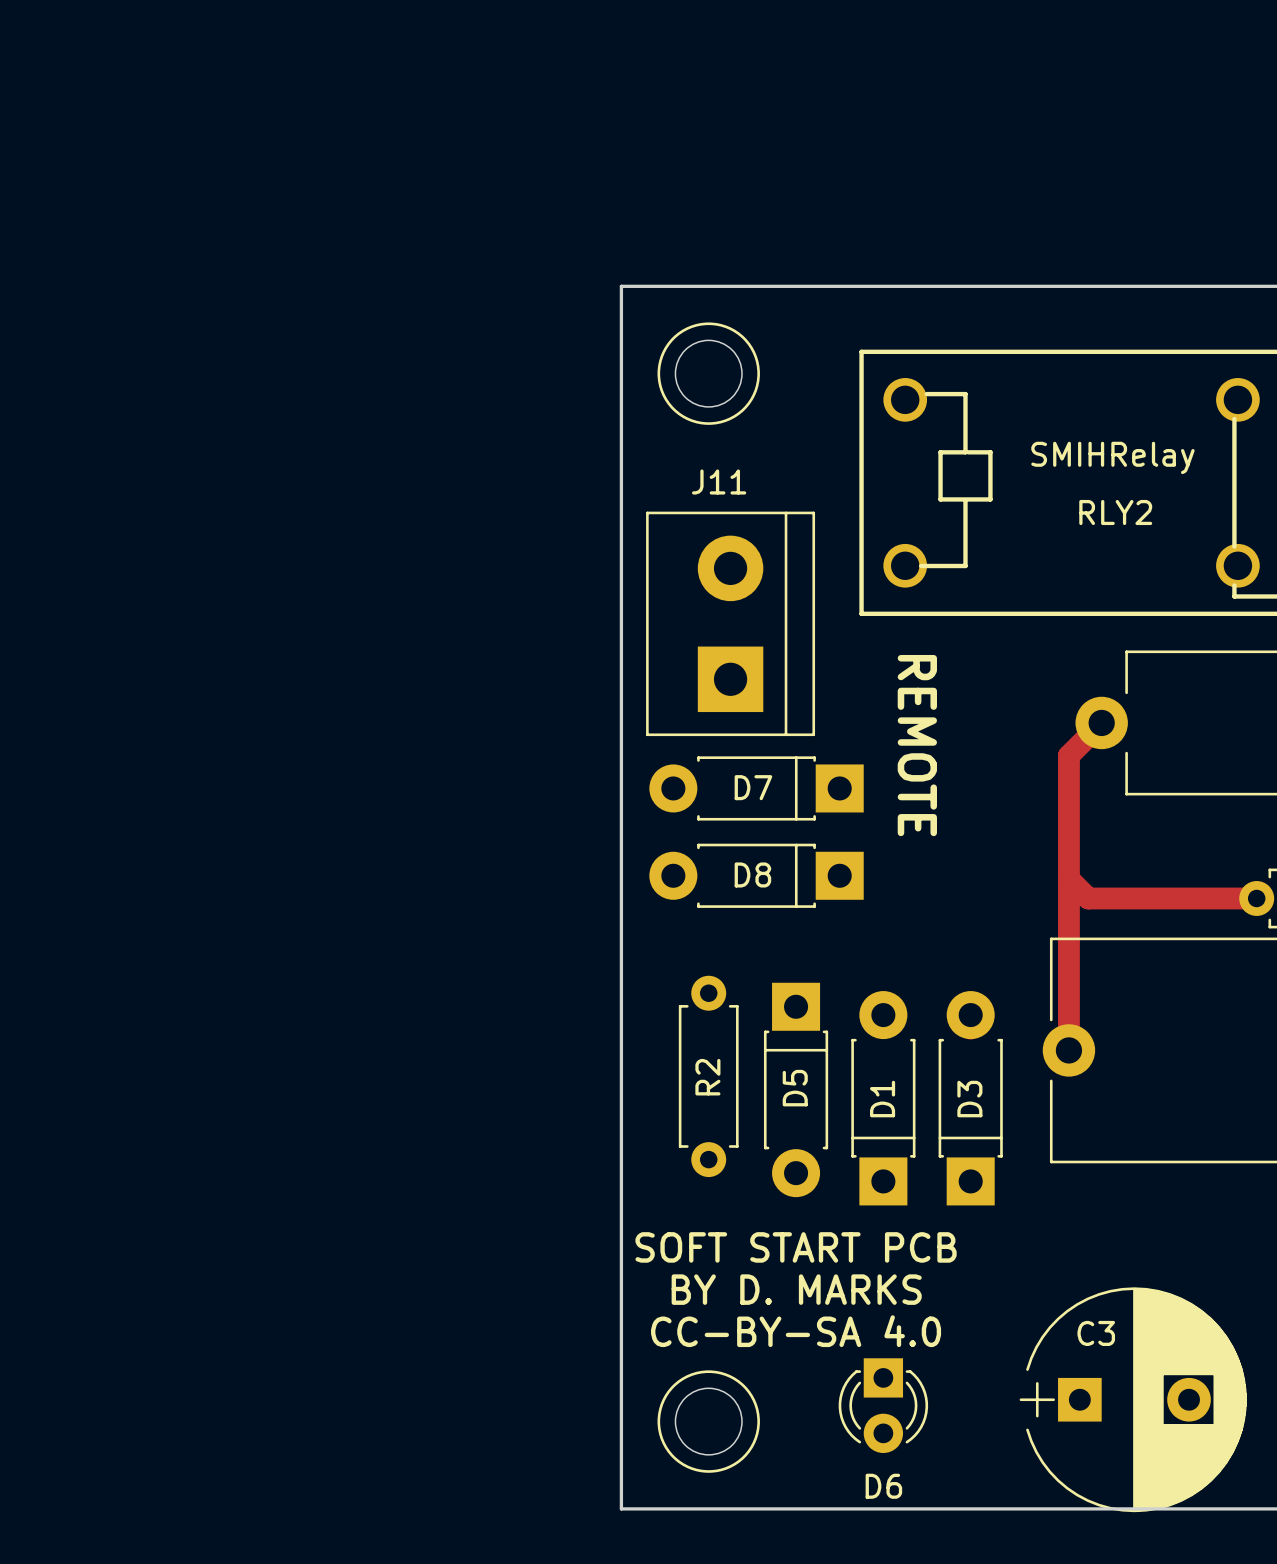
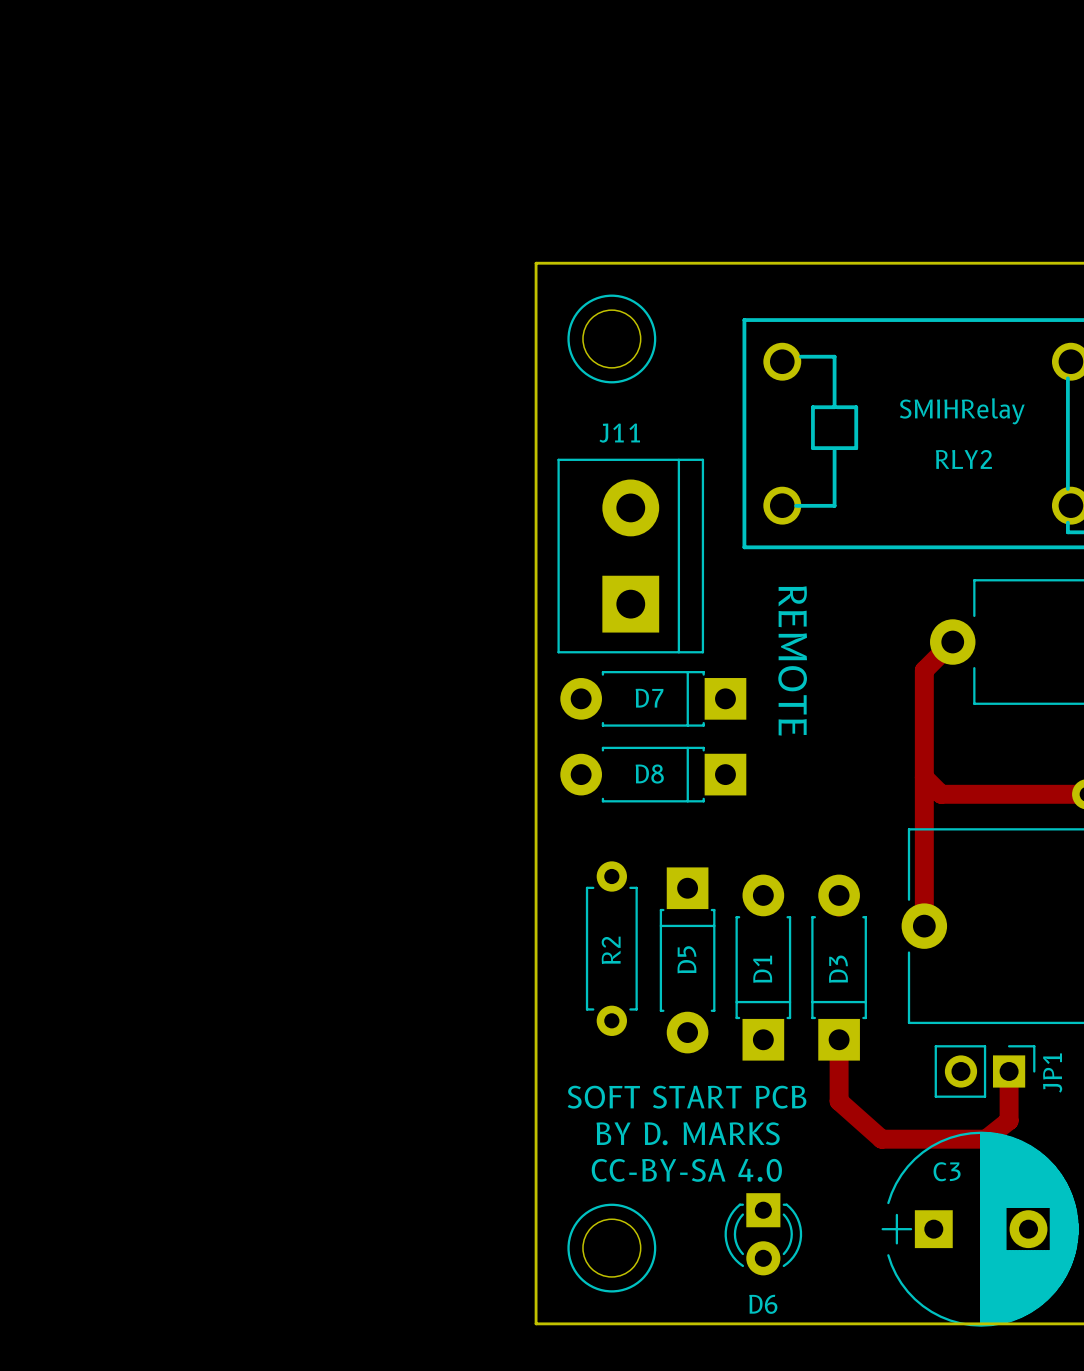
track: none -> (839, 1039) (839, 1101) (881, 1139) (985, 1139) (1009, 1120) (1009, 1071)
JP1: none -> (985, 1071)

